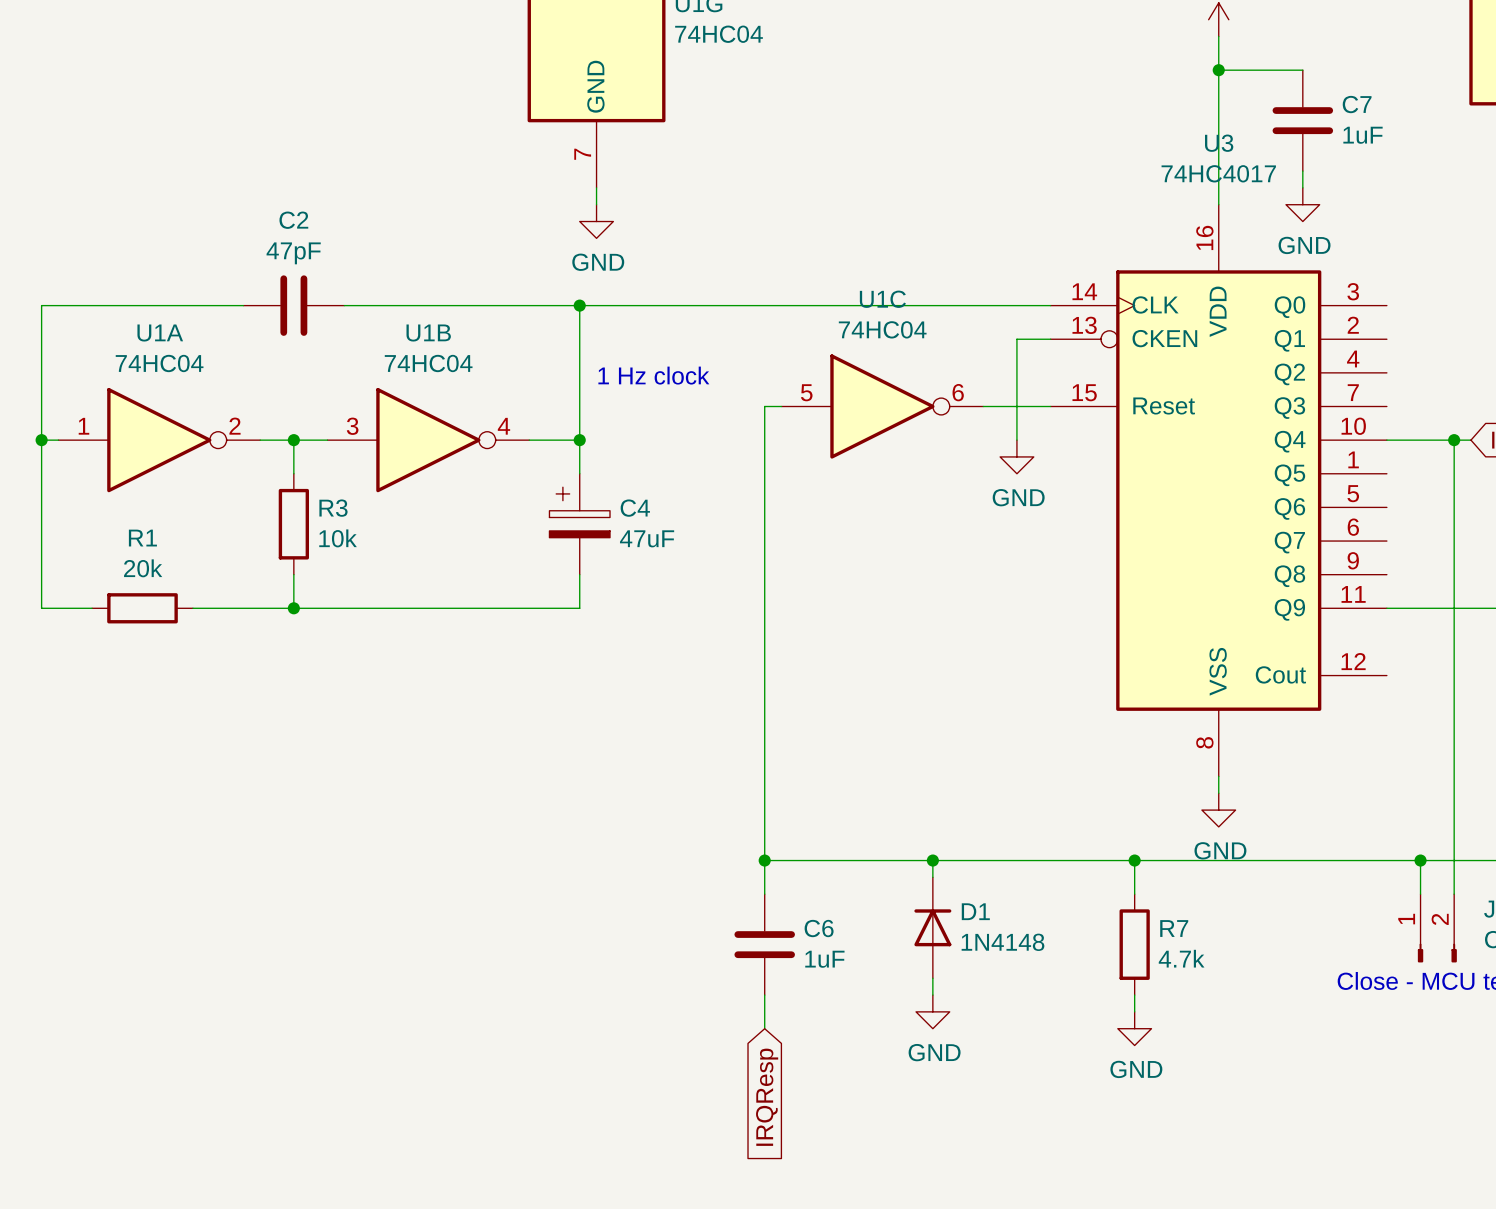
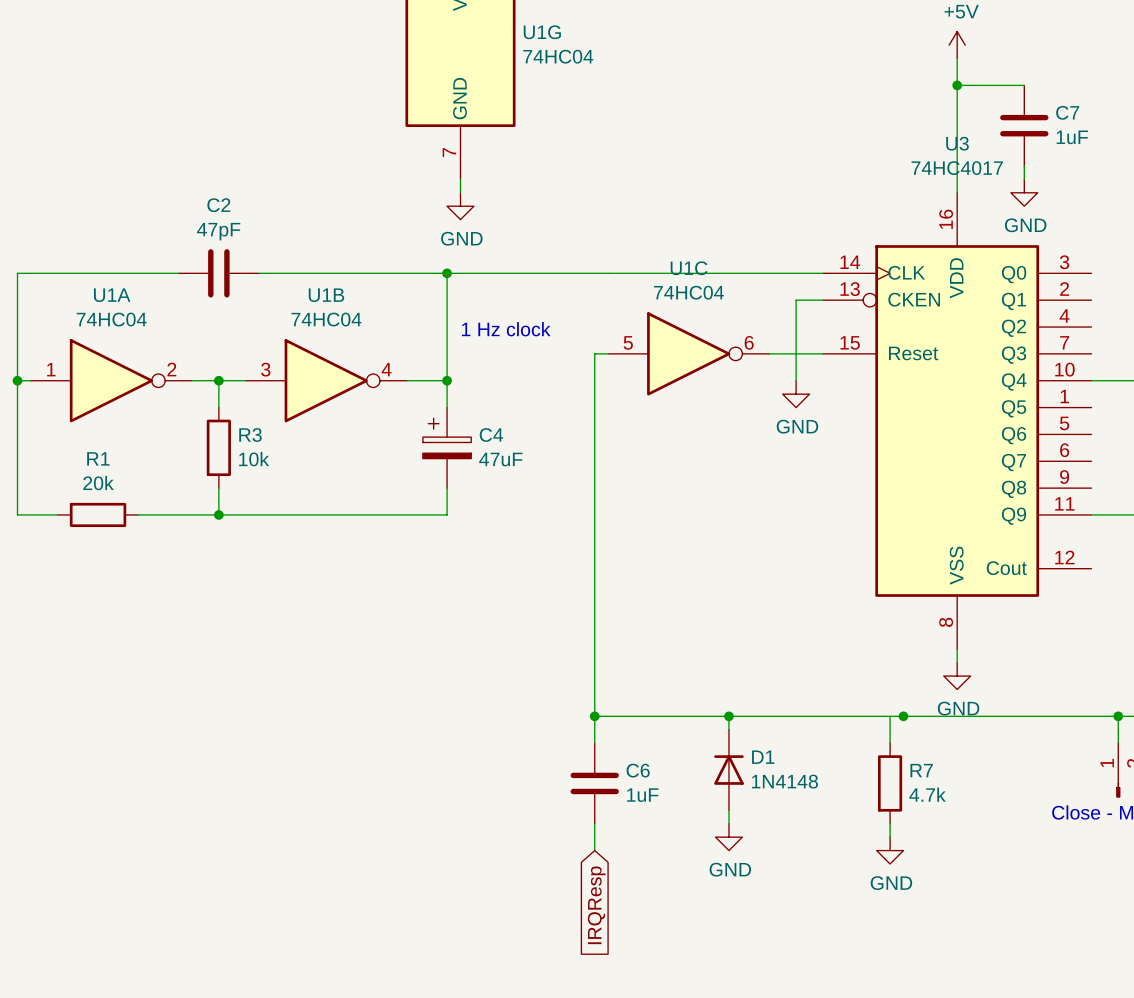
junction position: (1134, 860) -> (903, 716)

